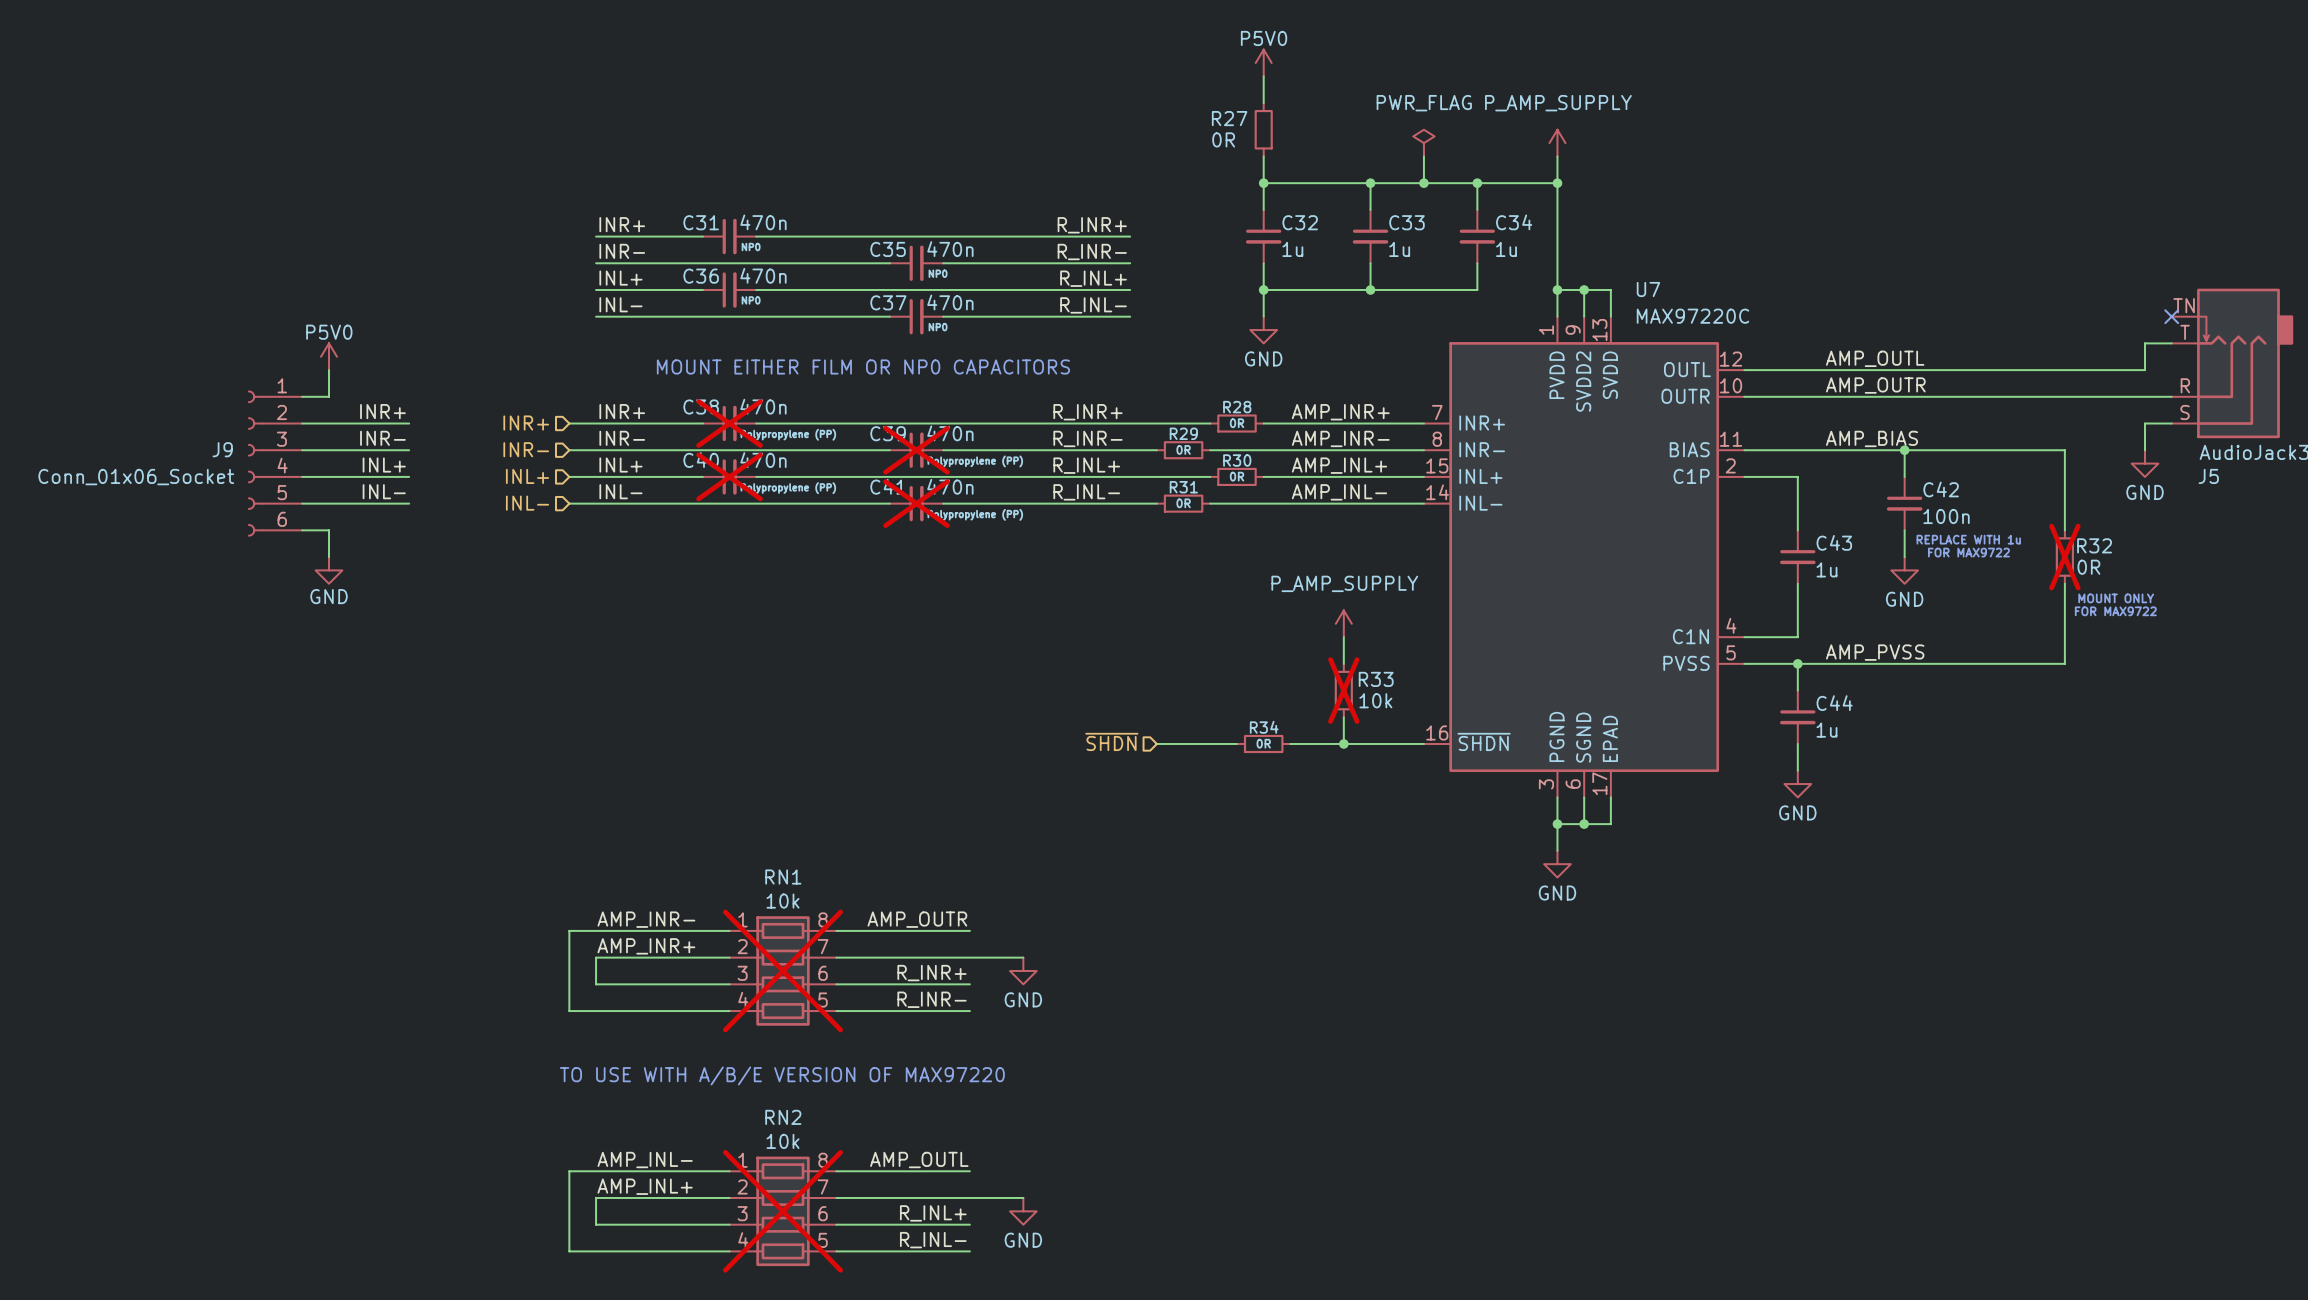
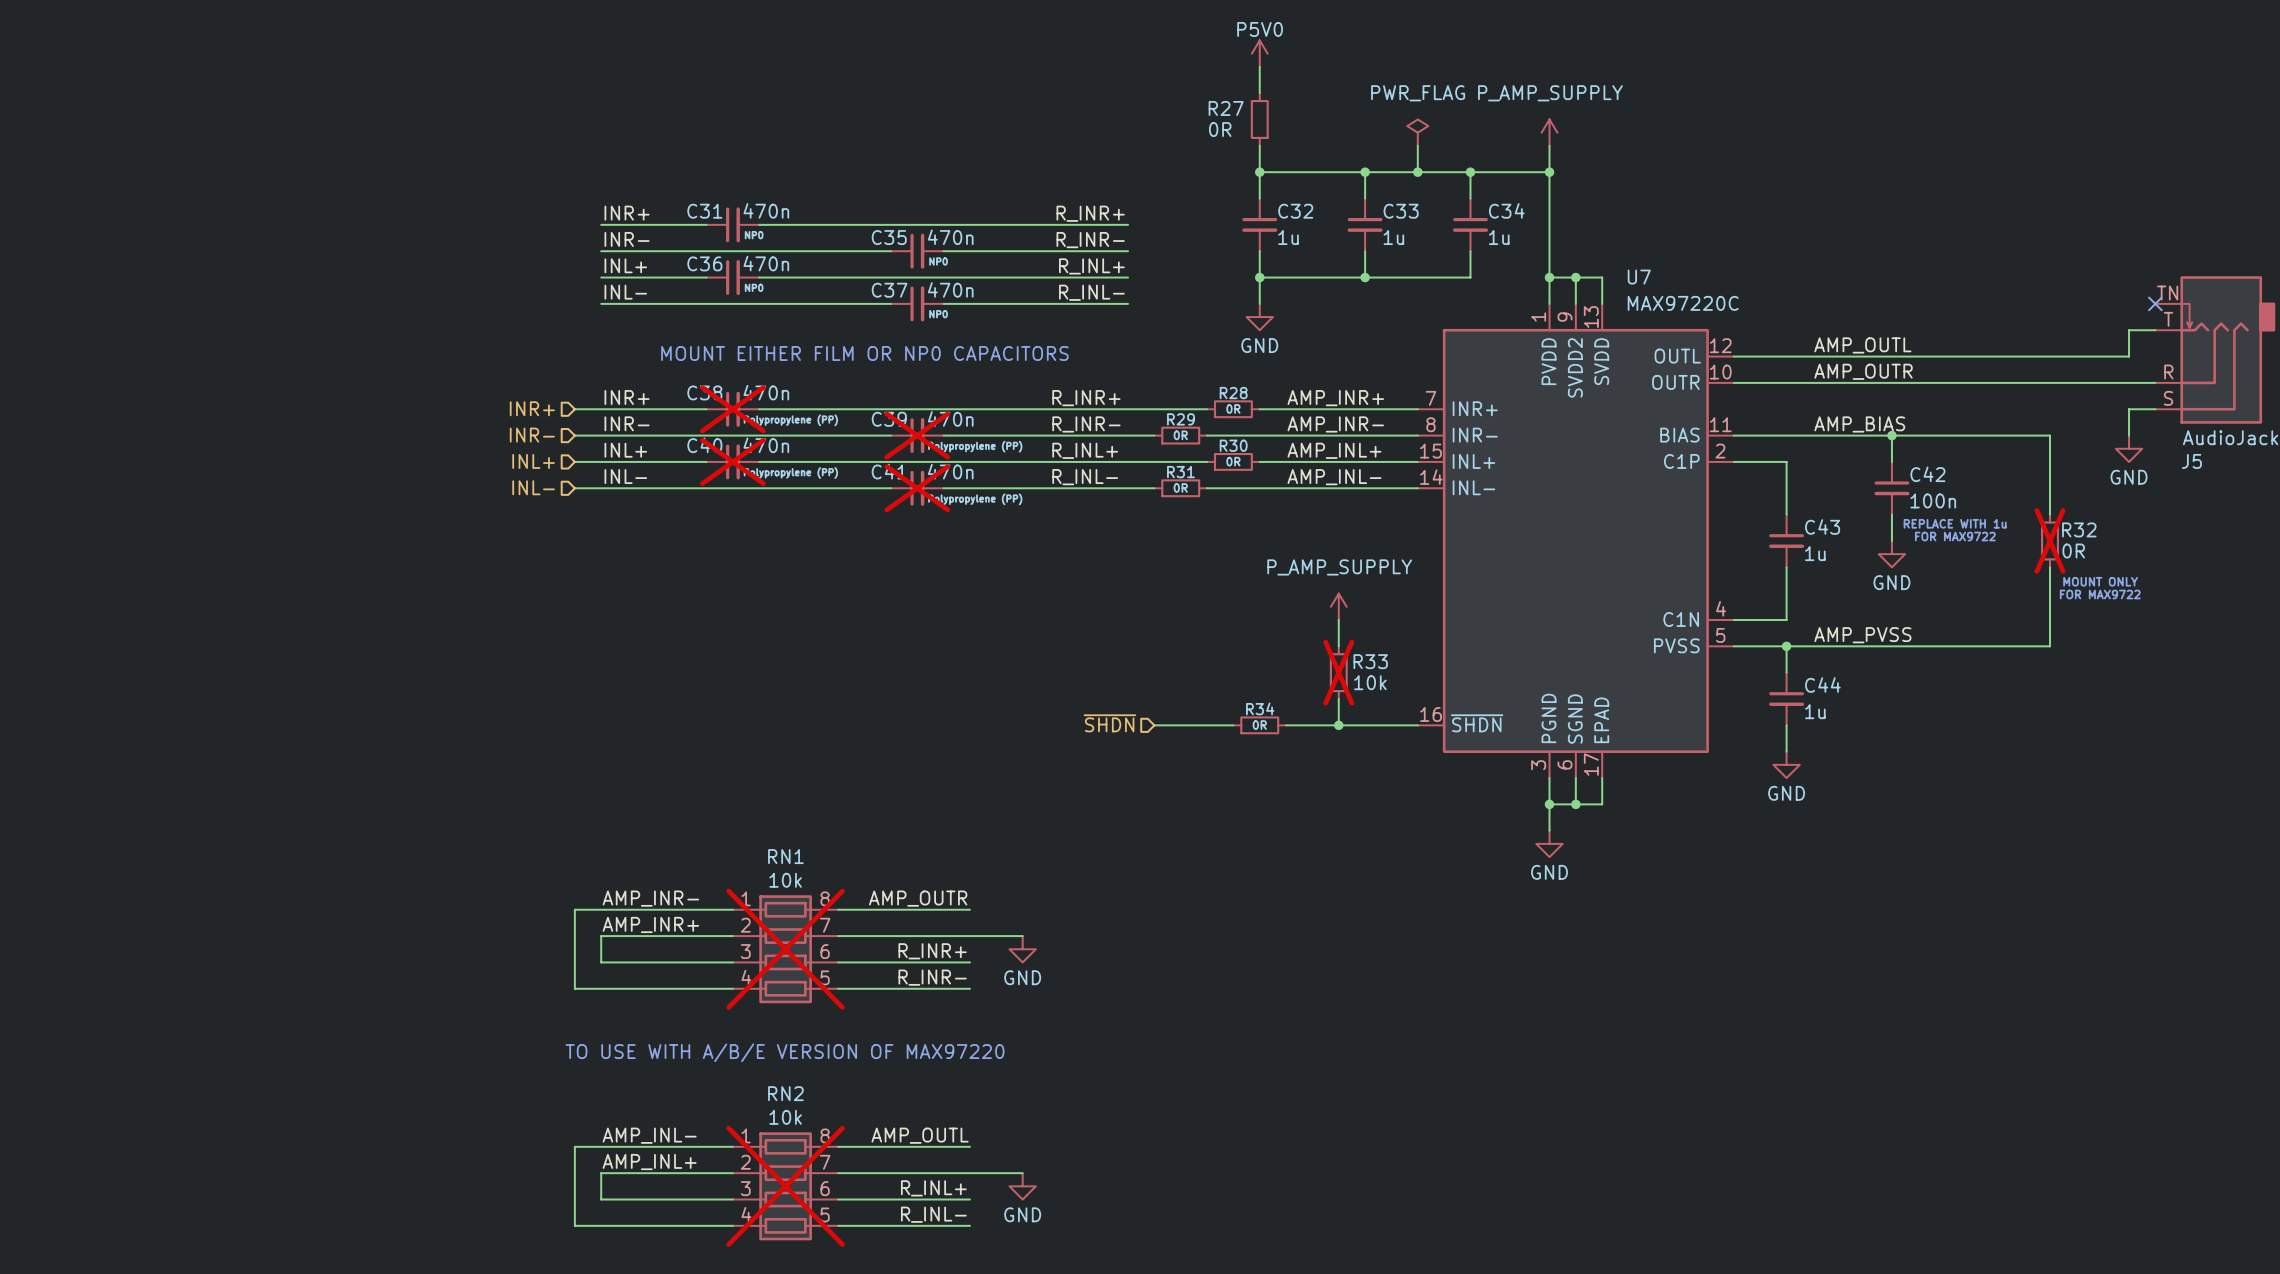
power symbol: P5V0 (329, 356) -> none
wire: (329, 370) (329, 396) (302, 396) -> none
label: INR+ (382, 411) -> none
wire: (302, 423) (409, 423) -> none
label: INR- (382, 438) -> none
wire: (302, 450) (409, 450) -> none
J9: Conn_01x06_Socket (275, 463) -> none
label: INL+ (384, 465) -> none
wire: (302, 476) (409, 476) -> none
label: INL- (384, 491) -> none
wire: (302, 503) (409, 503) -> none
wire: (302, 530) (329, 530) (329, 557) -> none
power symbol: GND (329, 570) -> none

